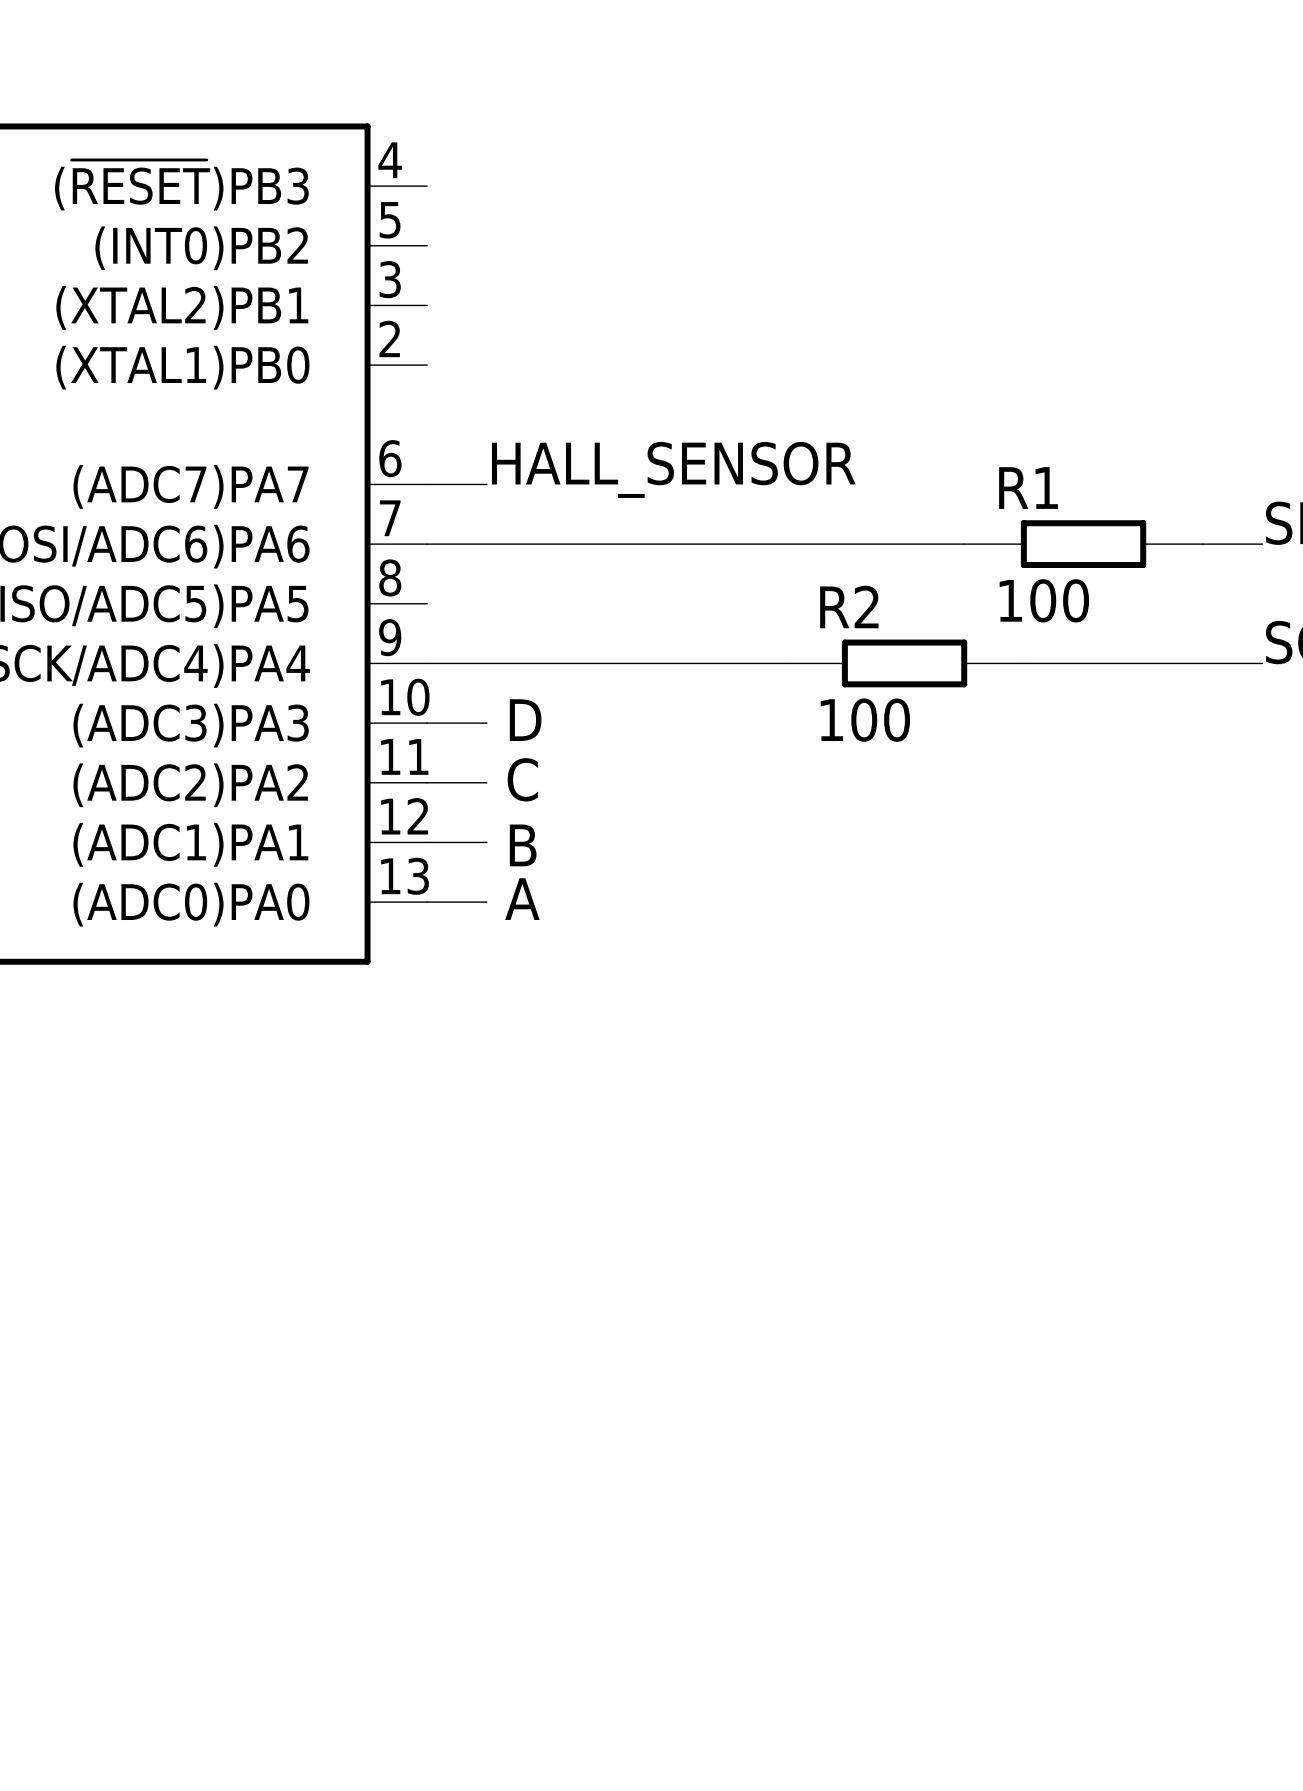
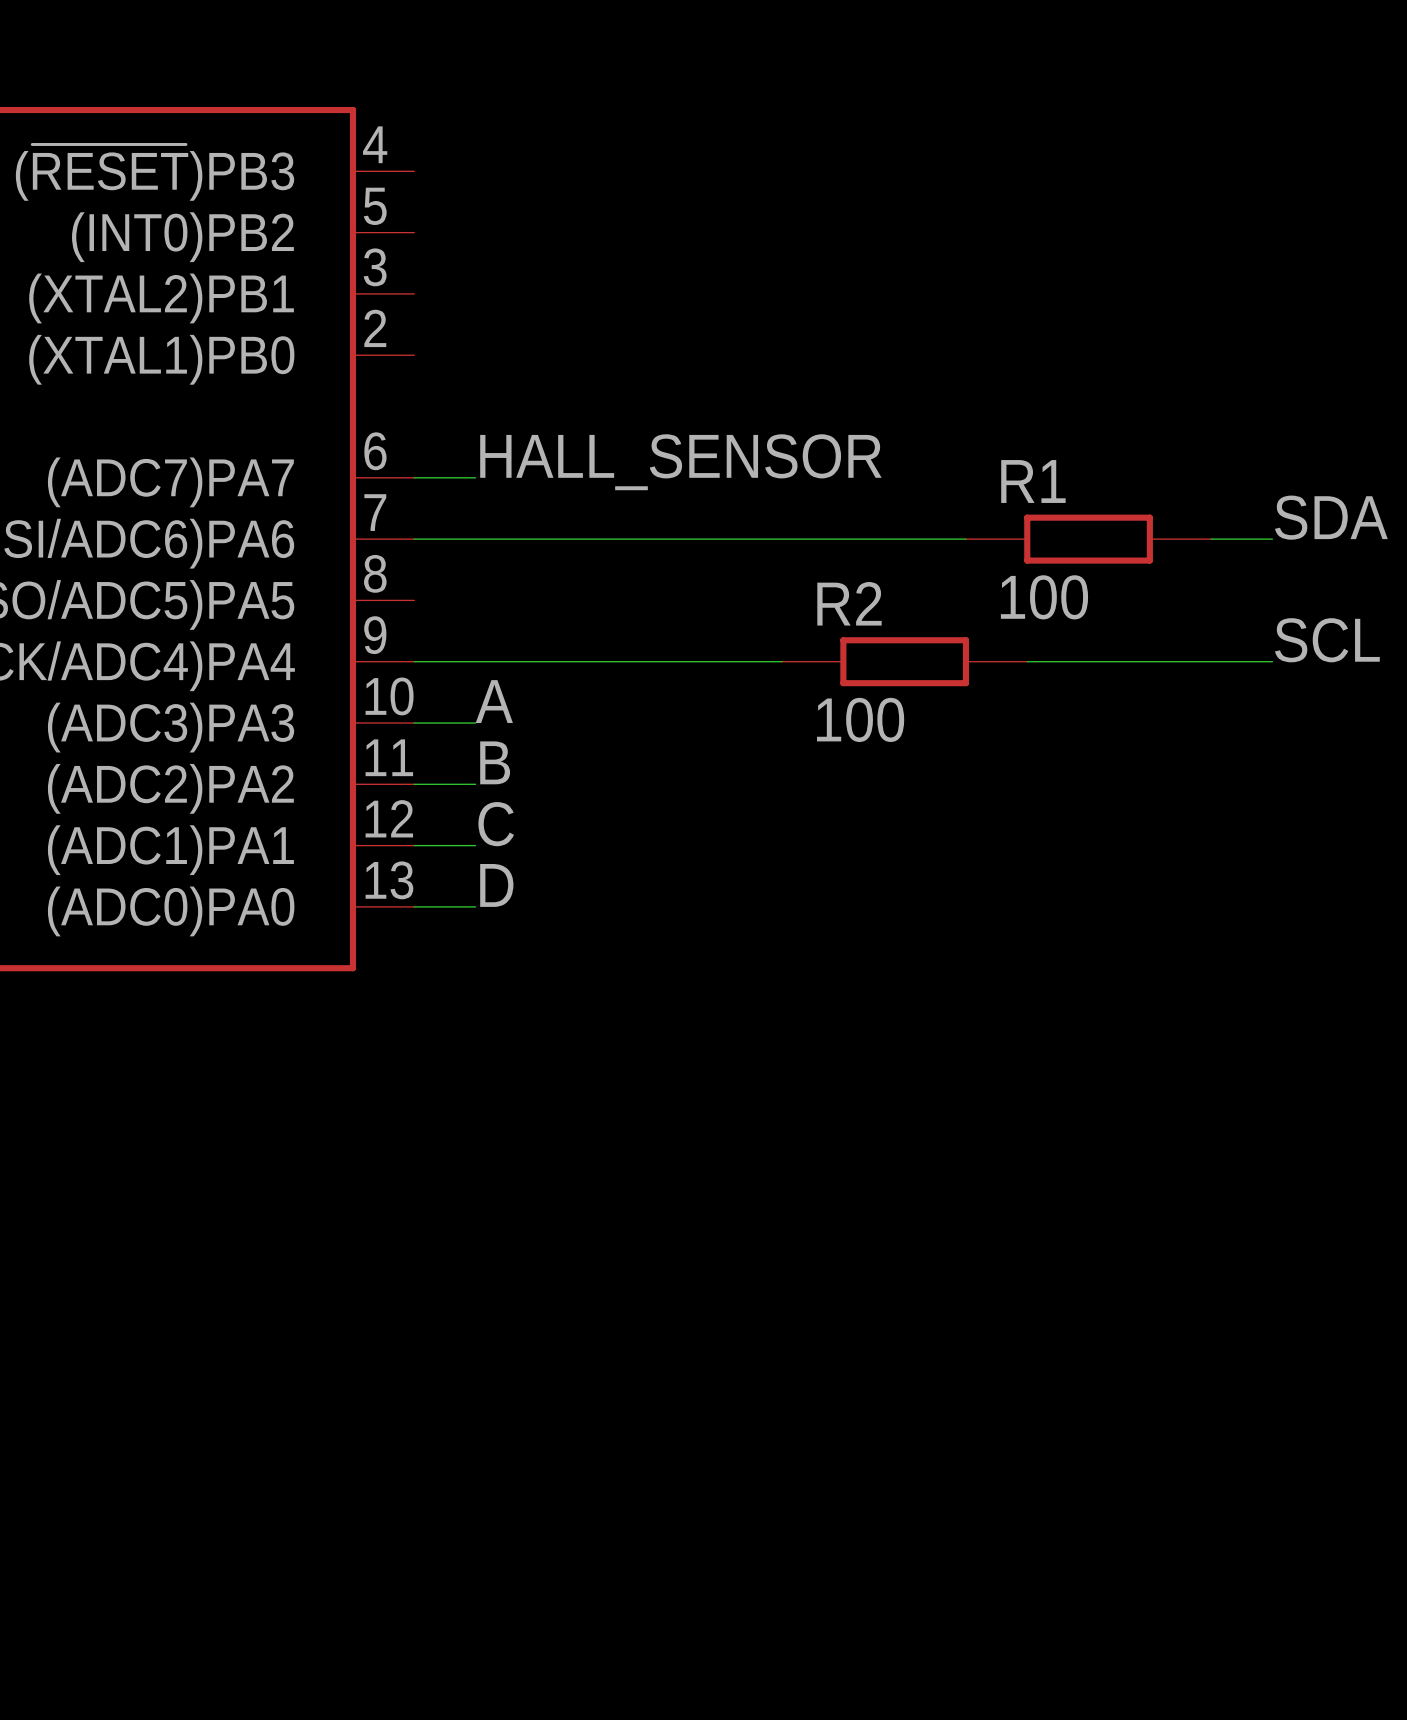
label position: D (525, 720) -> D (496, 885)
label position: C (522, 779) -> C (496, 824)
label position: B (523, 845) -> B (495, 762)
label position: A (522, 899) -> A (494, 701)

